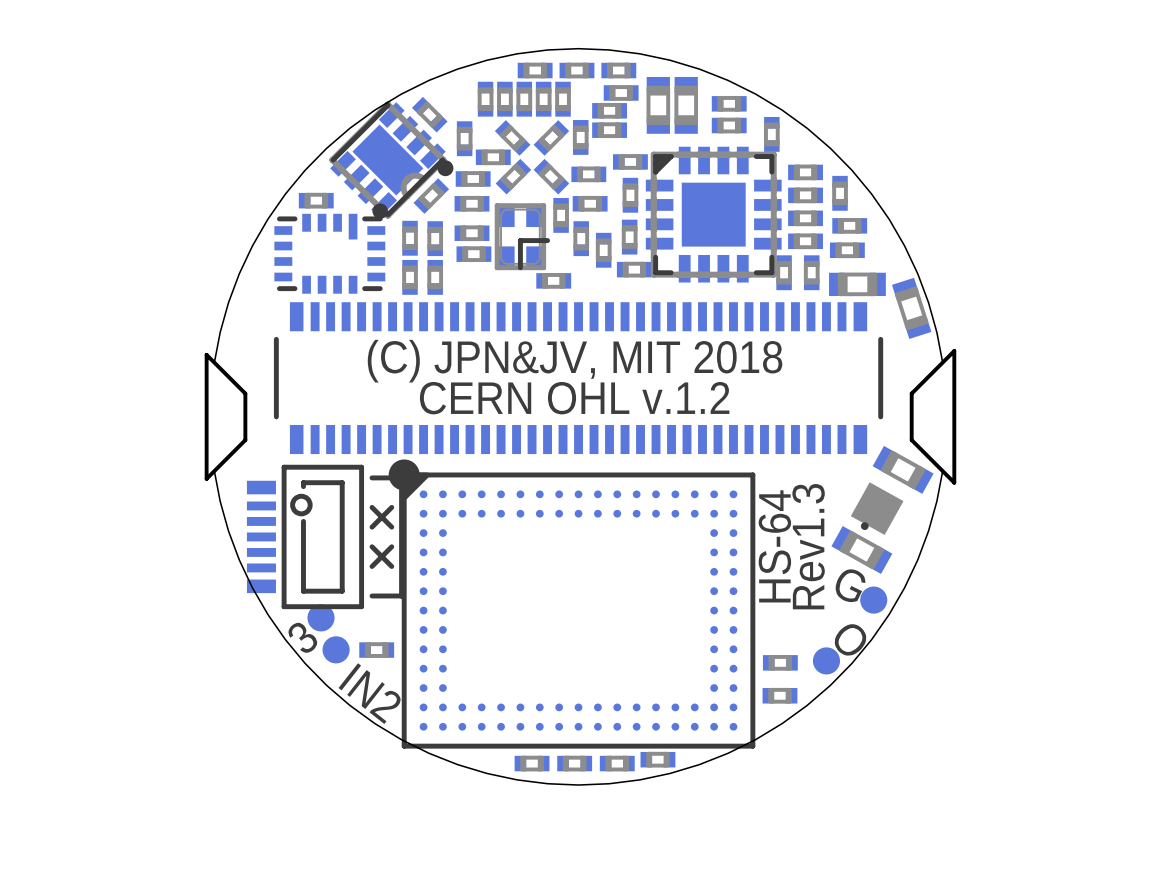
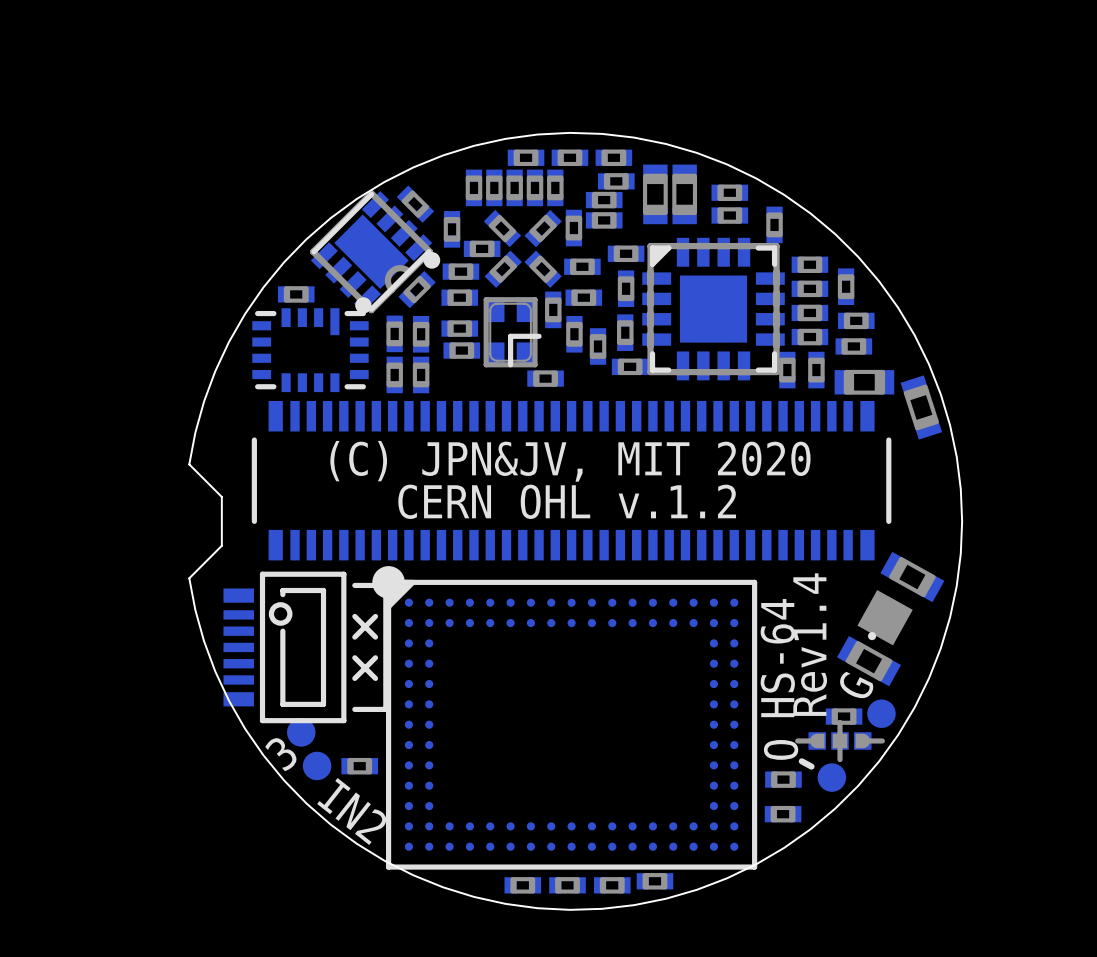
board edge: (206, 354) (206, 478) (245, 440) (245, 393) (206, 354) -> none
text: (C) JPN&JV, MIT 2018 (575, 361) -> (C) JPN&JV, MIT 2020 (570, 461)
board edge: (214, 362) (228, 302) (239, 273) (267, 219) (305, 170) (350, 128) (401, 94) (457, 69) (487, 60) (547, 49) (609, 49) (670, 60) (728, 80) (782, 110) (830, 148) (851, 170) (889, 219) (904, 245) (928, 302) (936, 332) (942, 362) (911, 393) -> (189, 464) (204, 401) (228, 342) (263, 287) (306, 239) (330, 218) (384, 182) (413, 167) (474, 145) (537, 134) (602, 133) (665, 143) (727, 164) (784, 194) (810, 213) (858, 256) (879, 281) (914, 335) (940, 394) (956, 457) (962, 521) (956, 585) (940, 648) (914, 707) (879, 761) (858, 785) (810, 829) (784, 847) (727, 878) (665, 898) (602, 908) (537, 908) (474, 896) (413, 875) (384, 860) (330, 824) (306, 803) (263, 755) (228, 700) (204, 641) (189, 578)
board edge: (911, 393) (911, 440) -> none
board edge: (911, 393) (954, 351) (954, 482) (911, 440) -> none
board edge: (911, 440) (942, 471) (936, 501) (928, 531) (904, 587) (889, 614) (851, 663) (830, 685) (782, 723) (728, 753) (670, 773) (609, 783) (547, 783) (487, 773) (457, 764) (401, 739) (350, 705) (305, 663) (267, 614) (239, 559) (228, 531) (214, 471) -> none
text: Rev1.3 (808, 546) -> Rev1.4 (810, 644)
text rotation: 0° (850, 585) -> 90° counterclockwise (856, 685)
part: none -> (844, 716)
part: none -> (840, 740)
text rotation: 0° (850, 639) -> 134.9° counterclockwise (781, 749)
line: none -> (801, 761) (811, 766)

